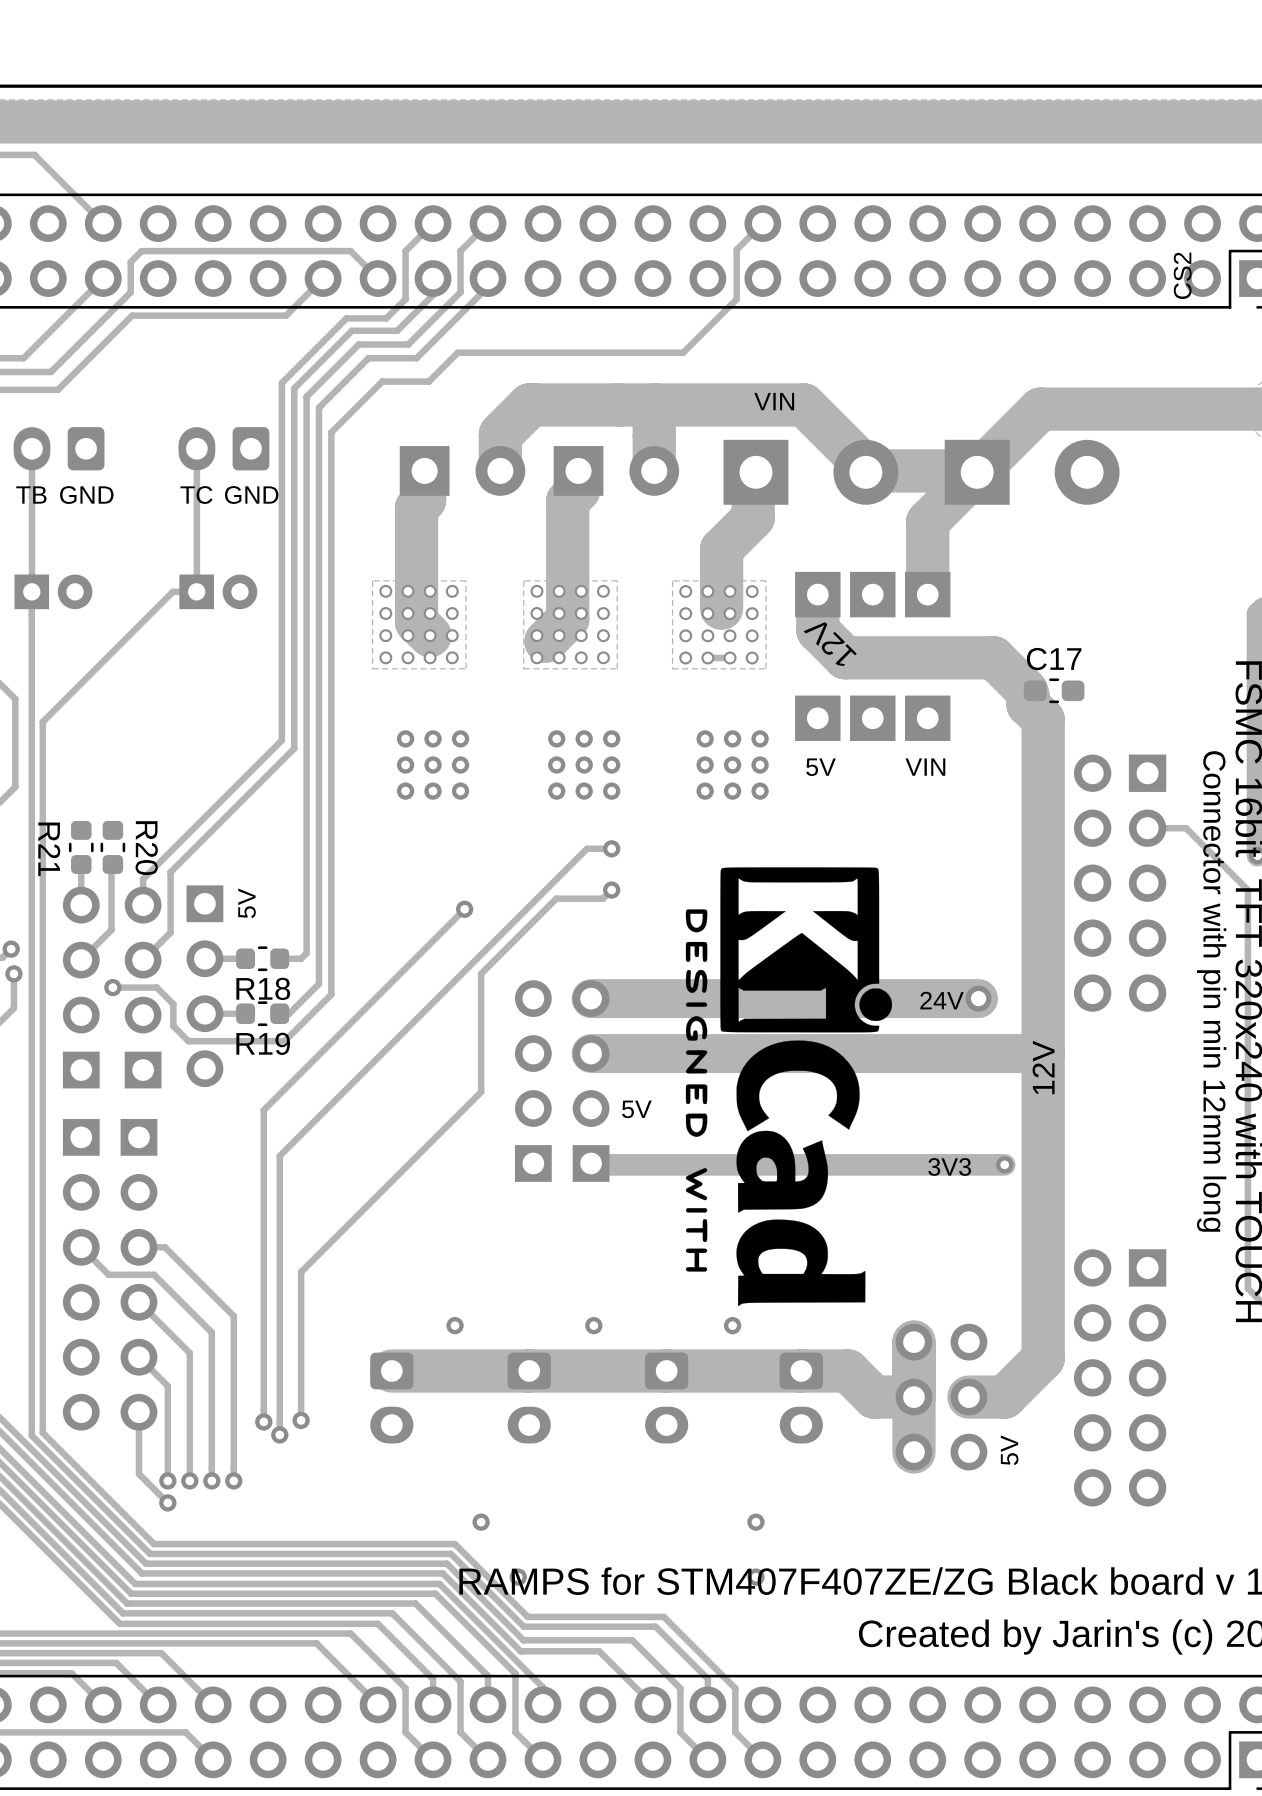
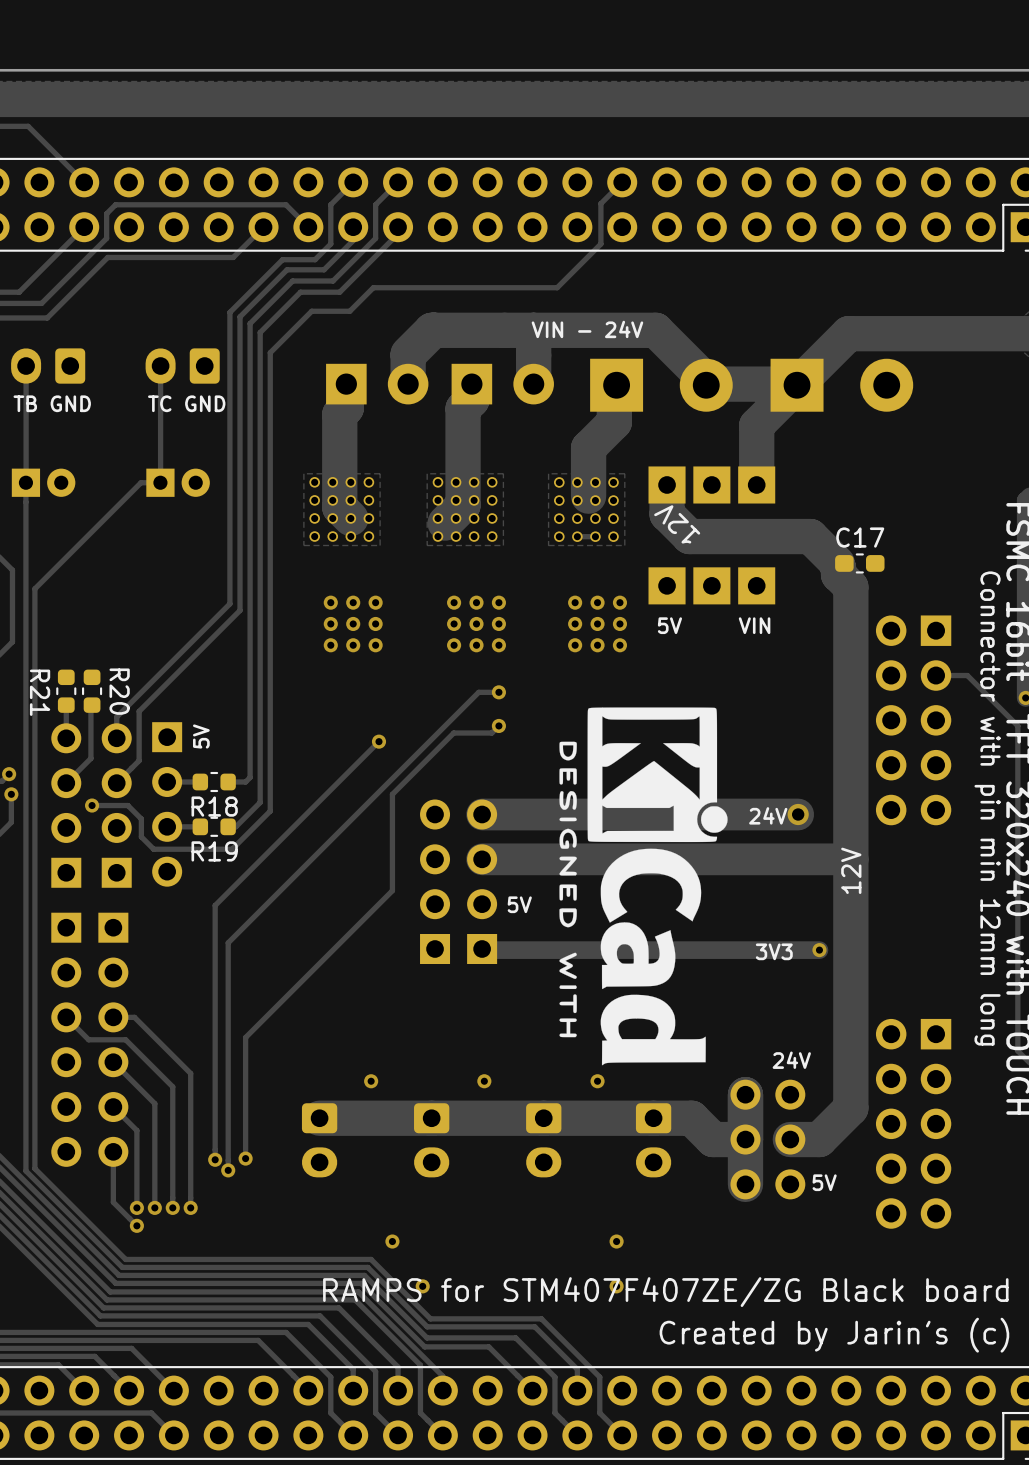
text: CS2 (1182, 275) -> none
text: VIN (774, 401) -> none
text: none -> VIN - 24V (587, 329)
text: none -> 24V (791, 1060)
text rotation: 0° (1009, 1450) -> 90° clockwise (824, 1182)

